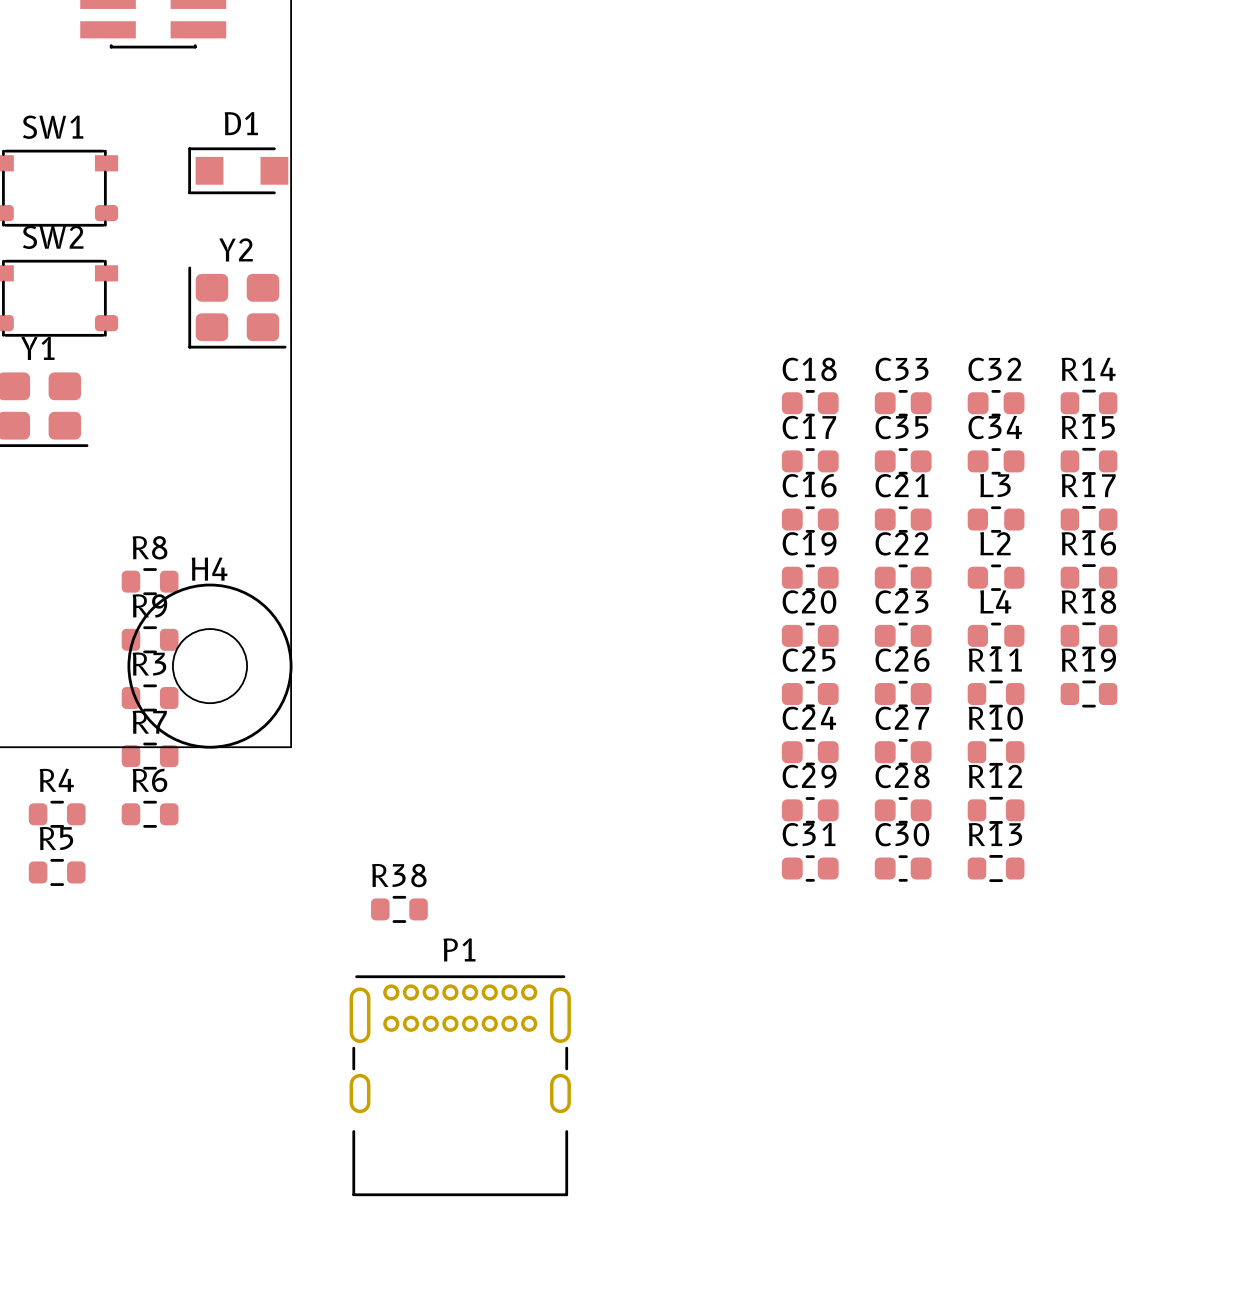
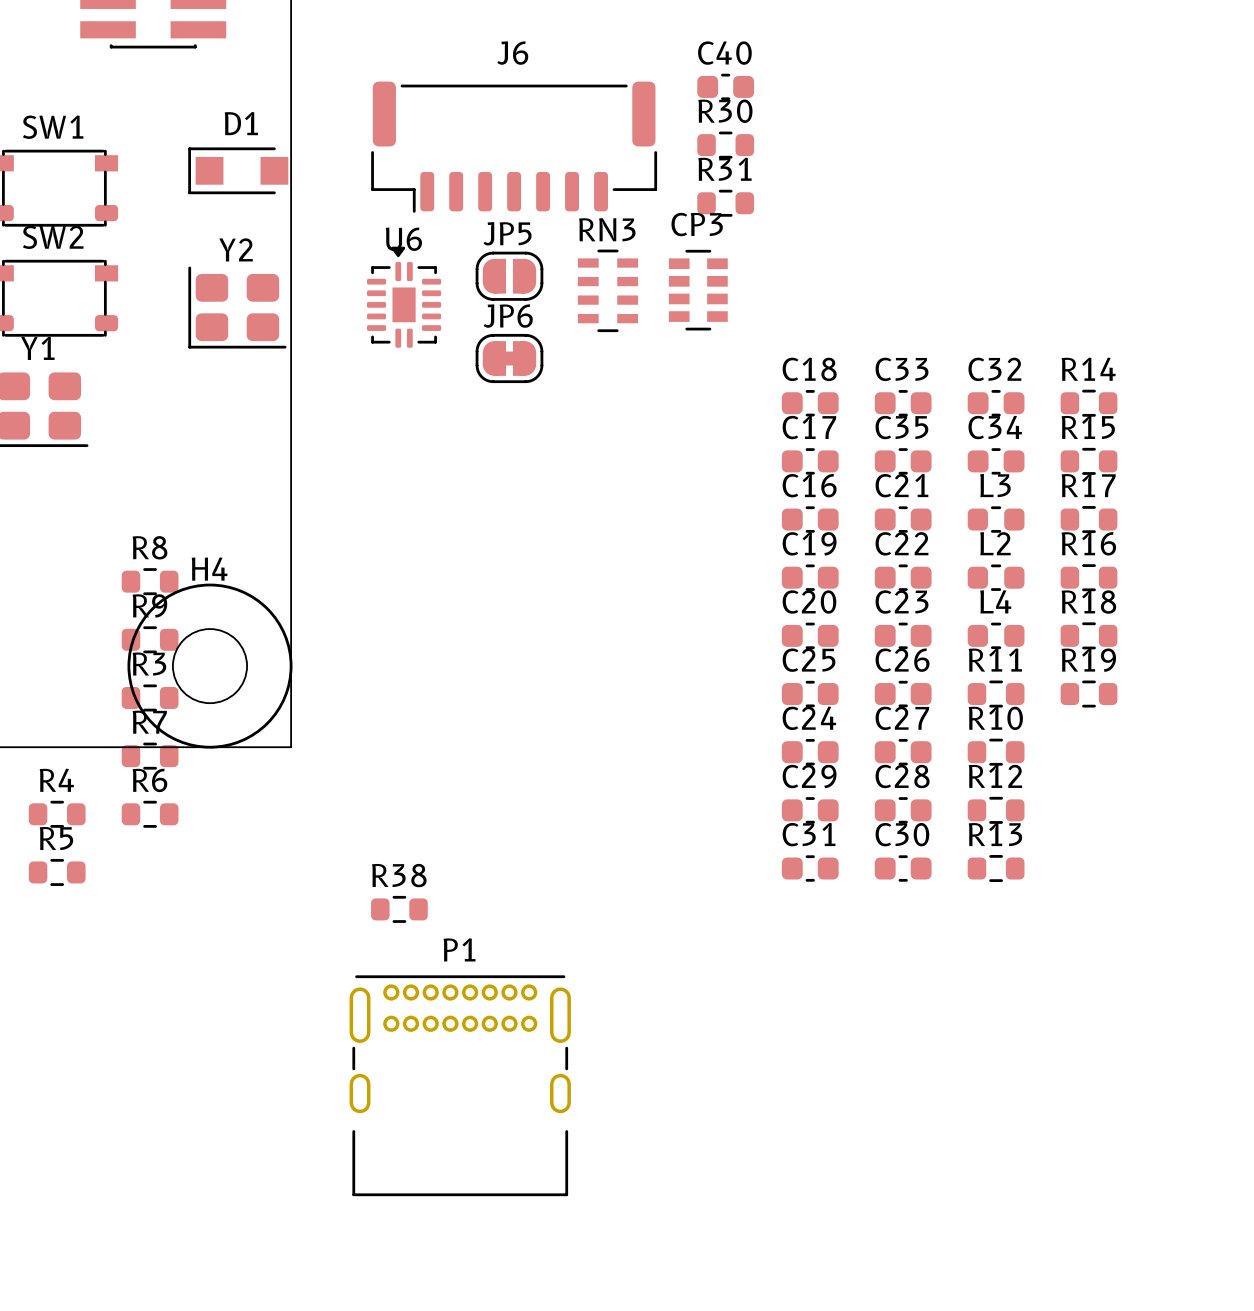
C40: none -> (725, 86)
R30: none -> (725, 145)
J6: none -> (514, 147)
R31: none -> (725, 203)
JP5: none -> (509, 276)
RN3: none -> (607, 290)
CP3: none -> (698, 290)
U6: none -> (404, 297)
JP6: none -> (509, 358)

